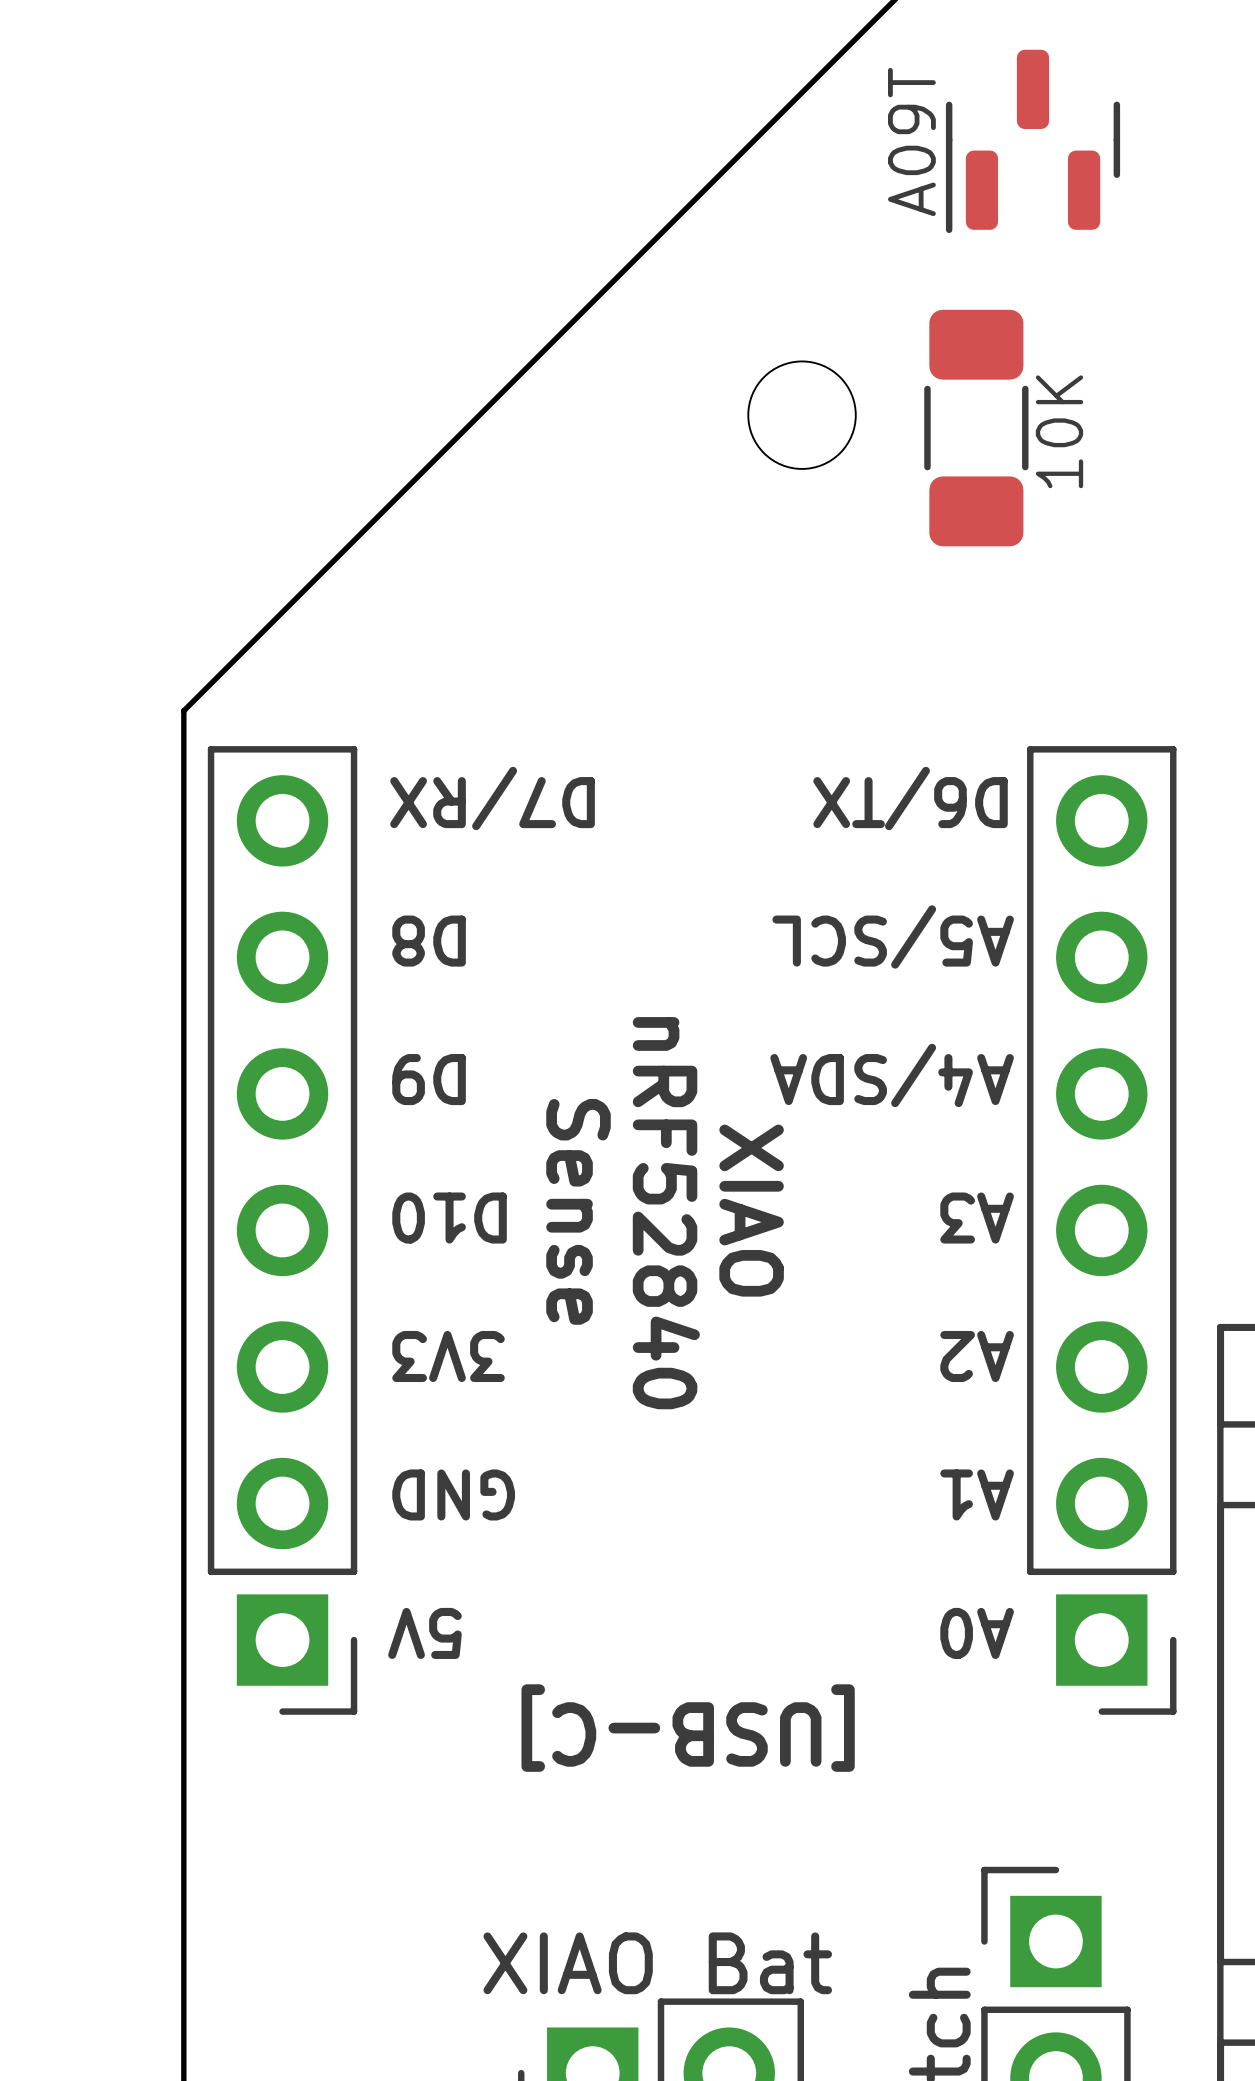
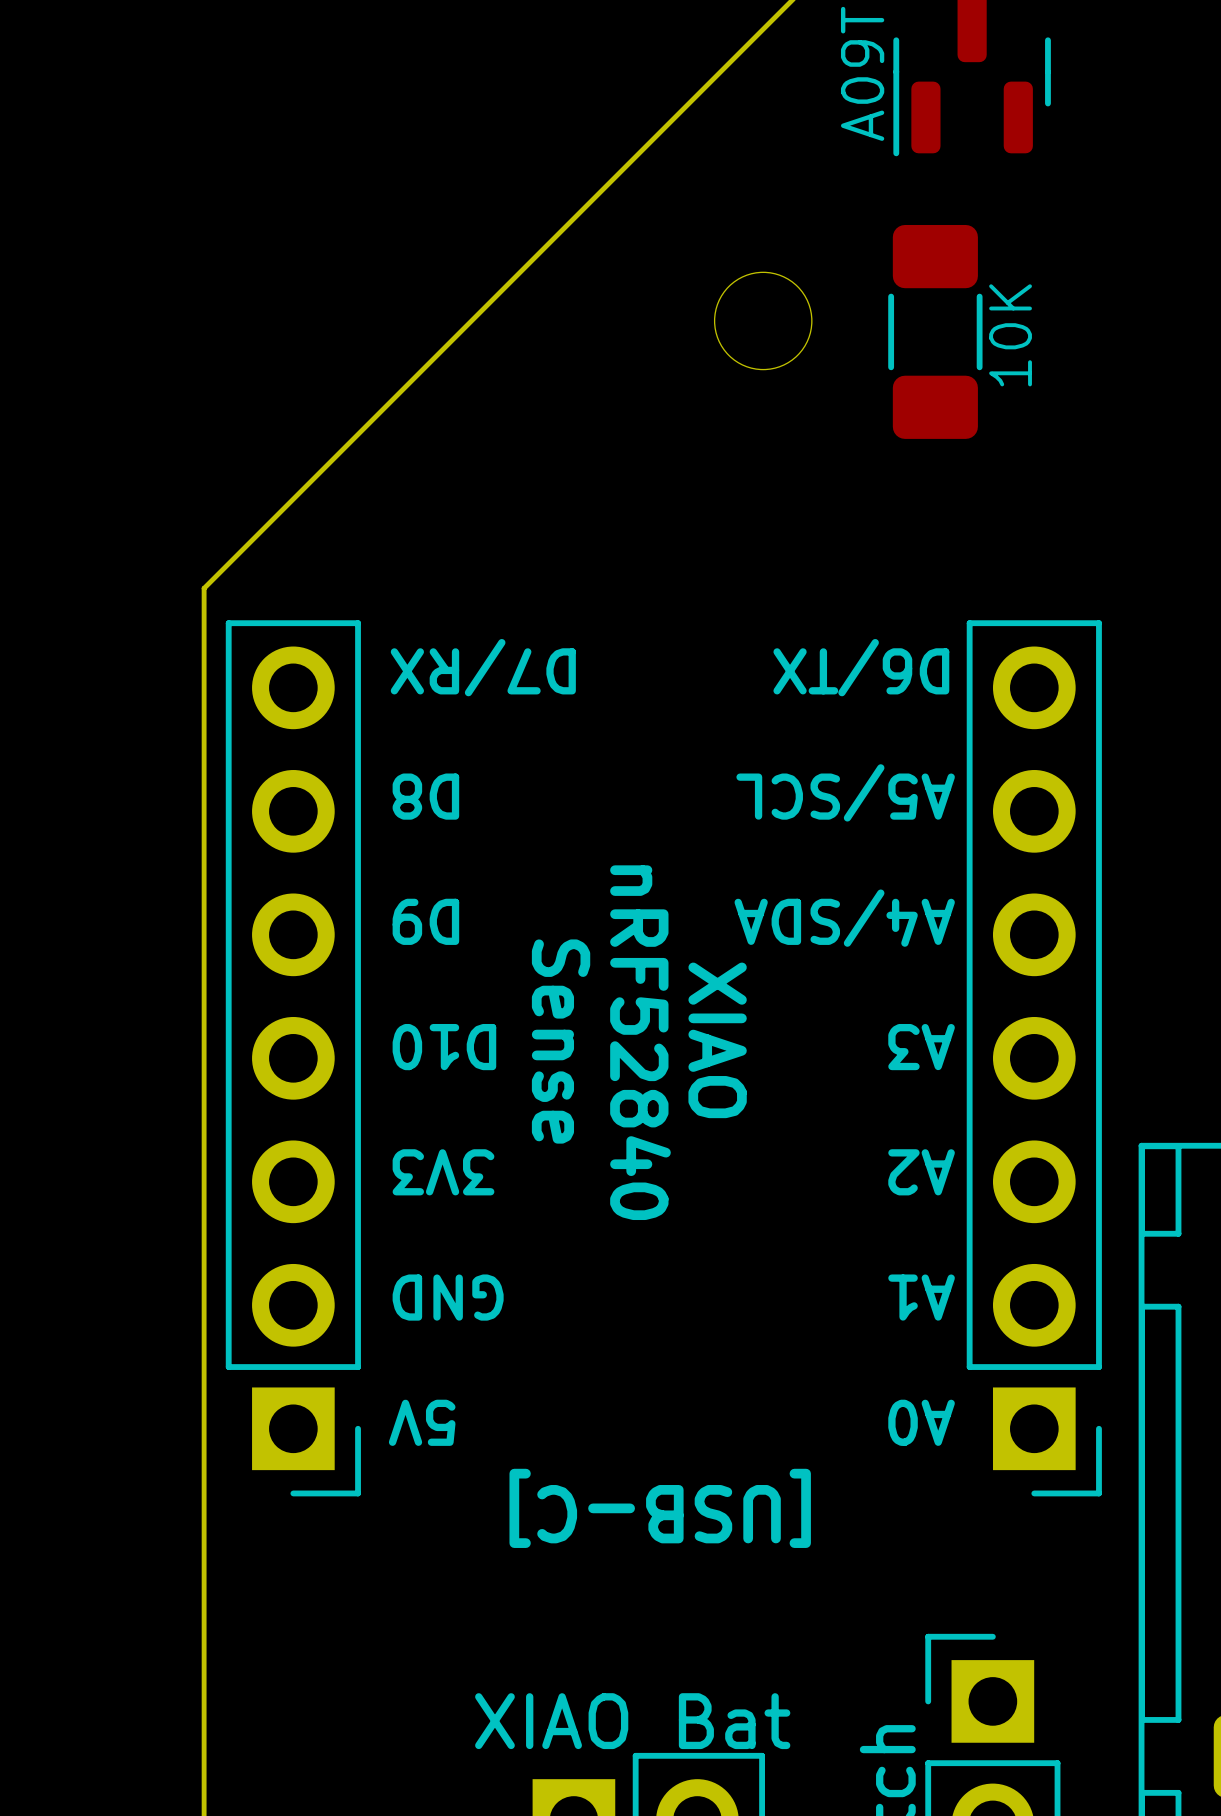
10K position: (976, 428) -> (935, 331)

